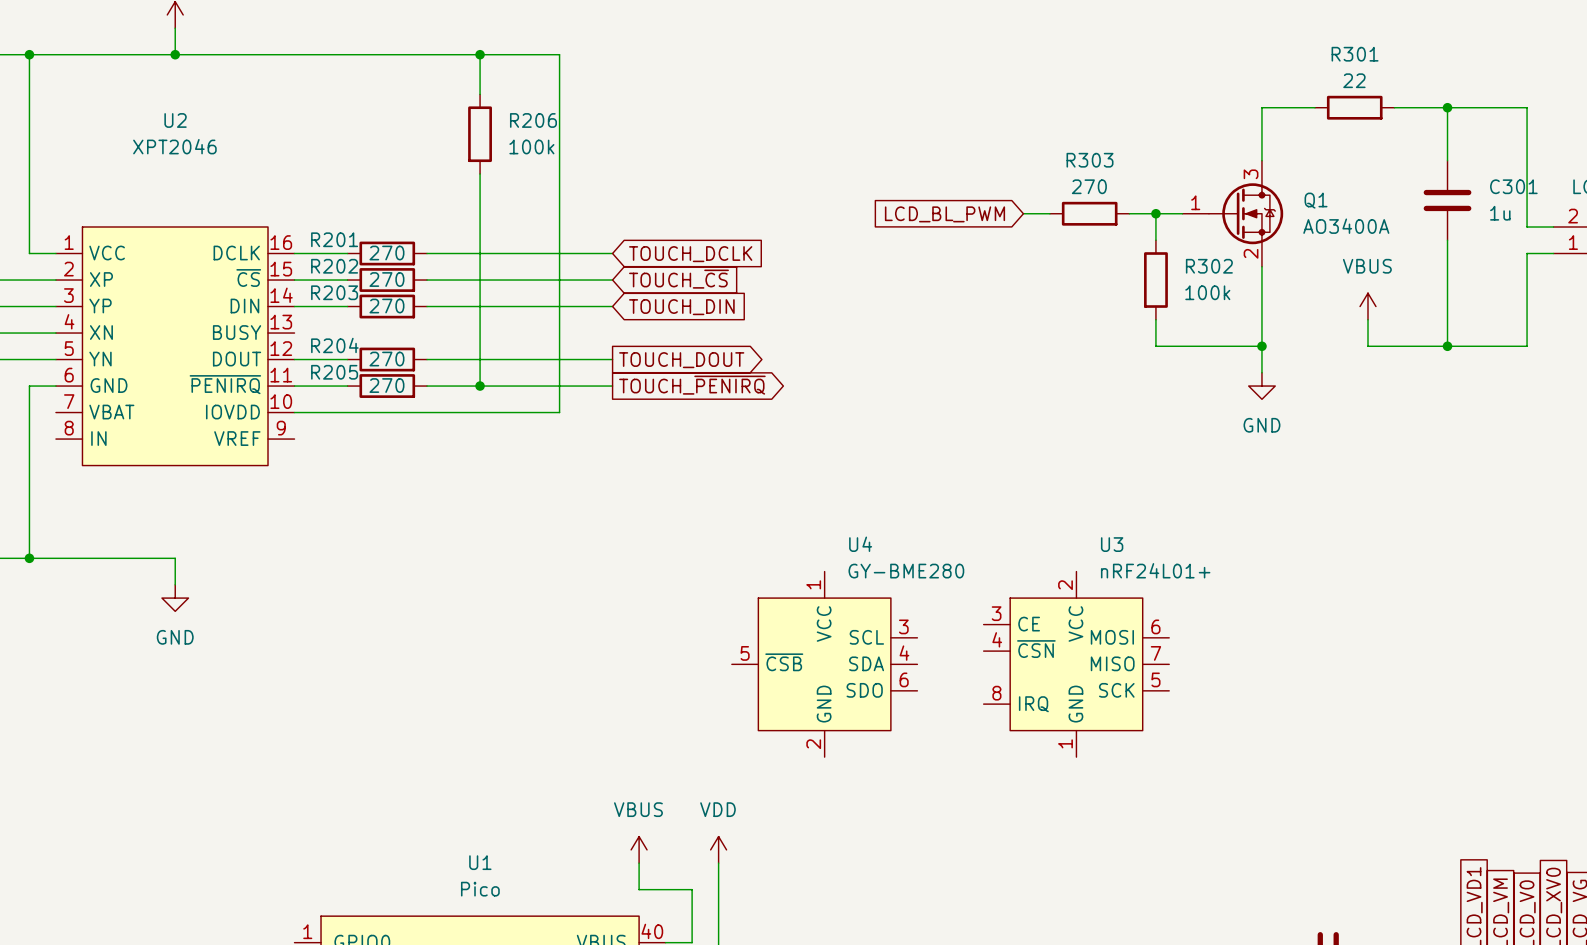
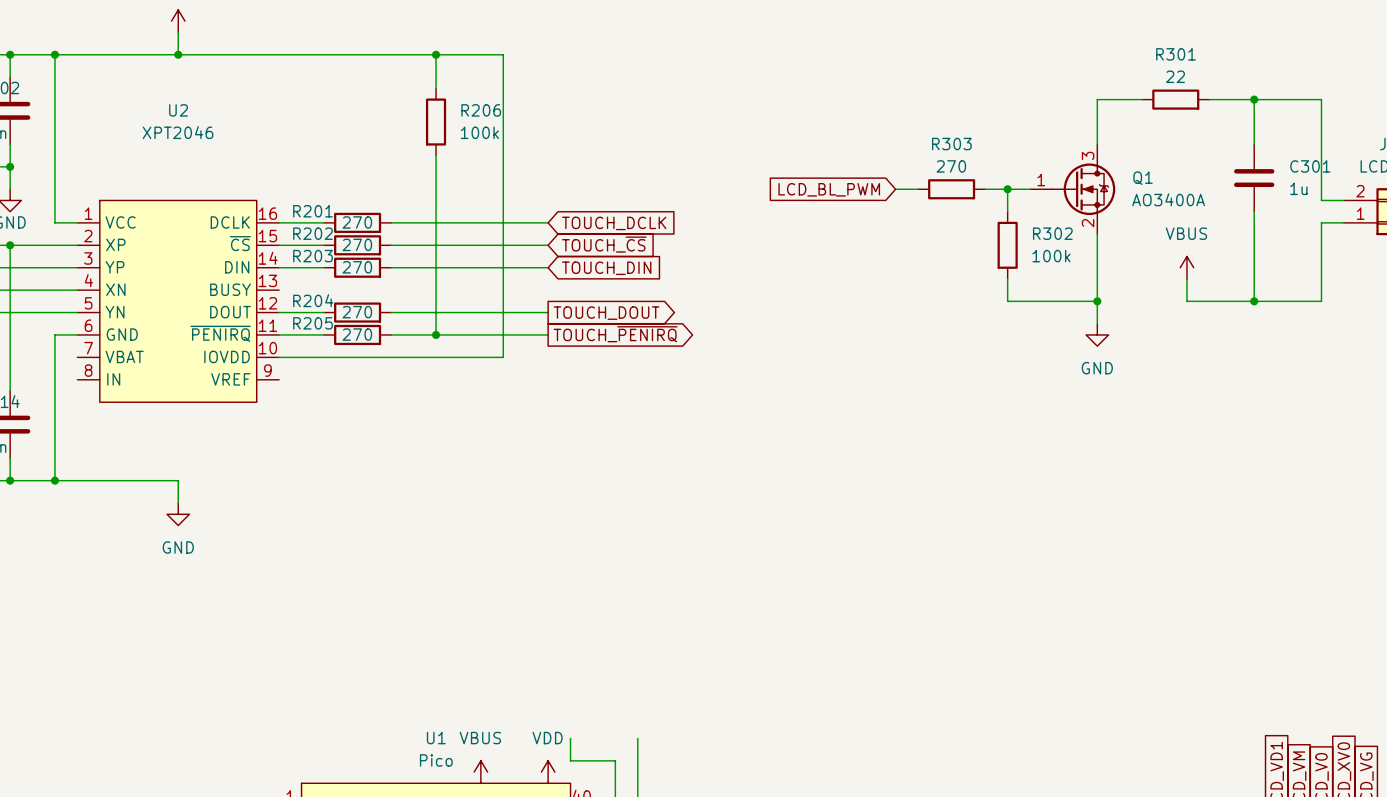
U4: GY-BME280 (824, 664) -> none
U3: nRF24L01+ (1076, 664) -> none
power symbol position: VBUS (639, 849) -> VBUS (480, 772)
power symbol position: VDD (718, 849) -> VDD (548, 772)

